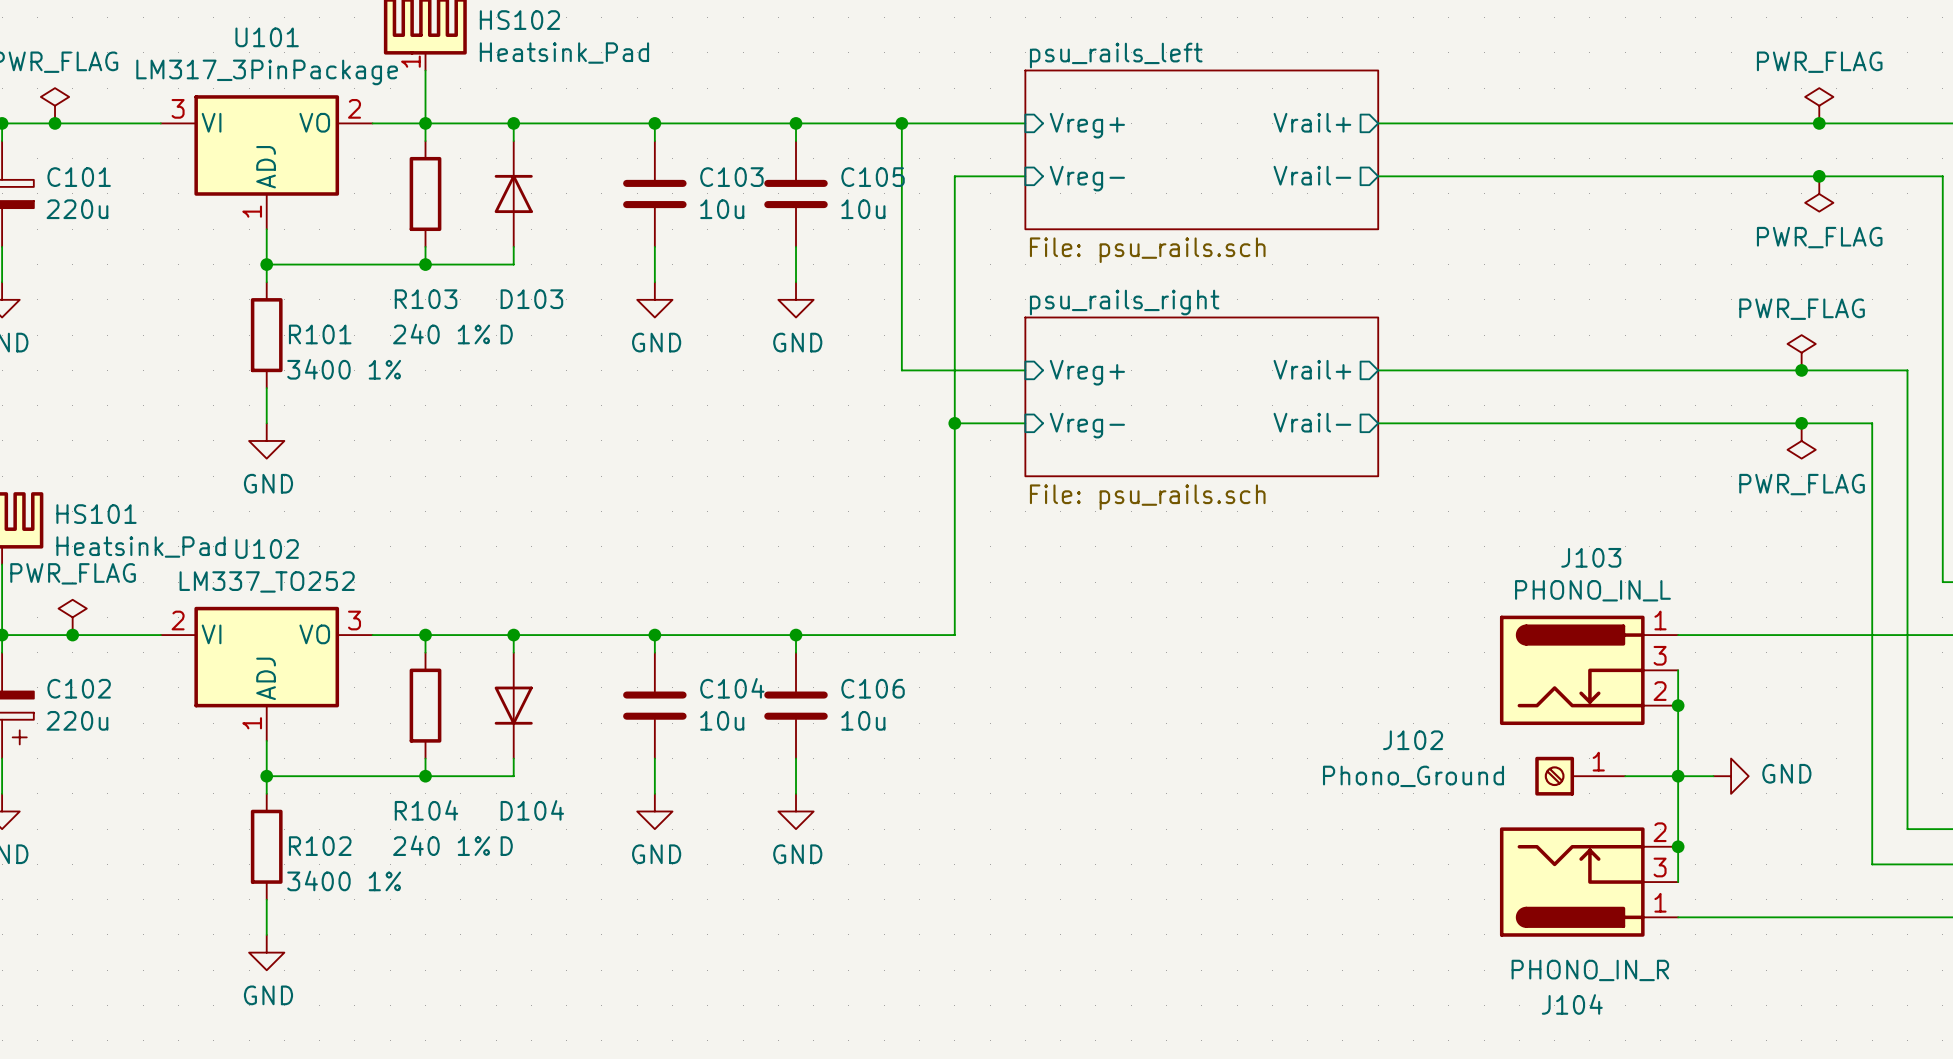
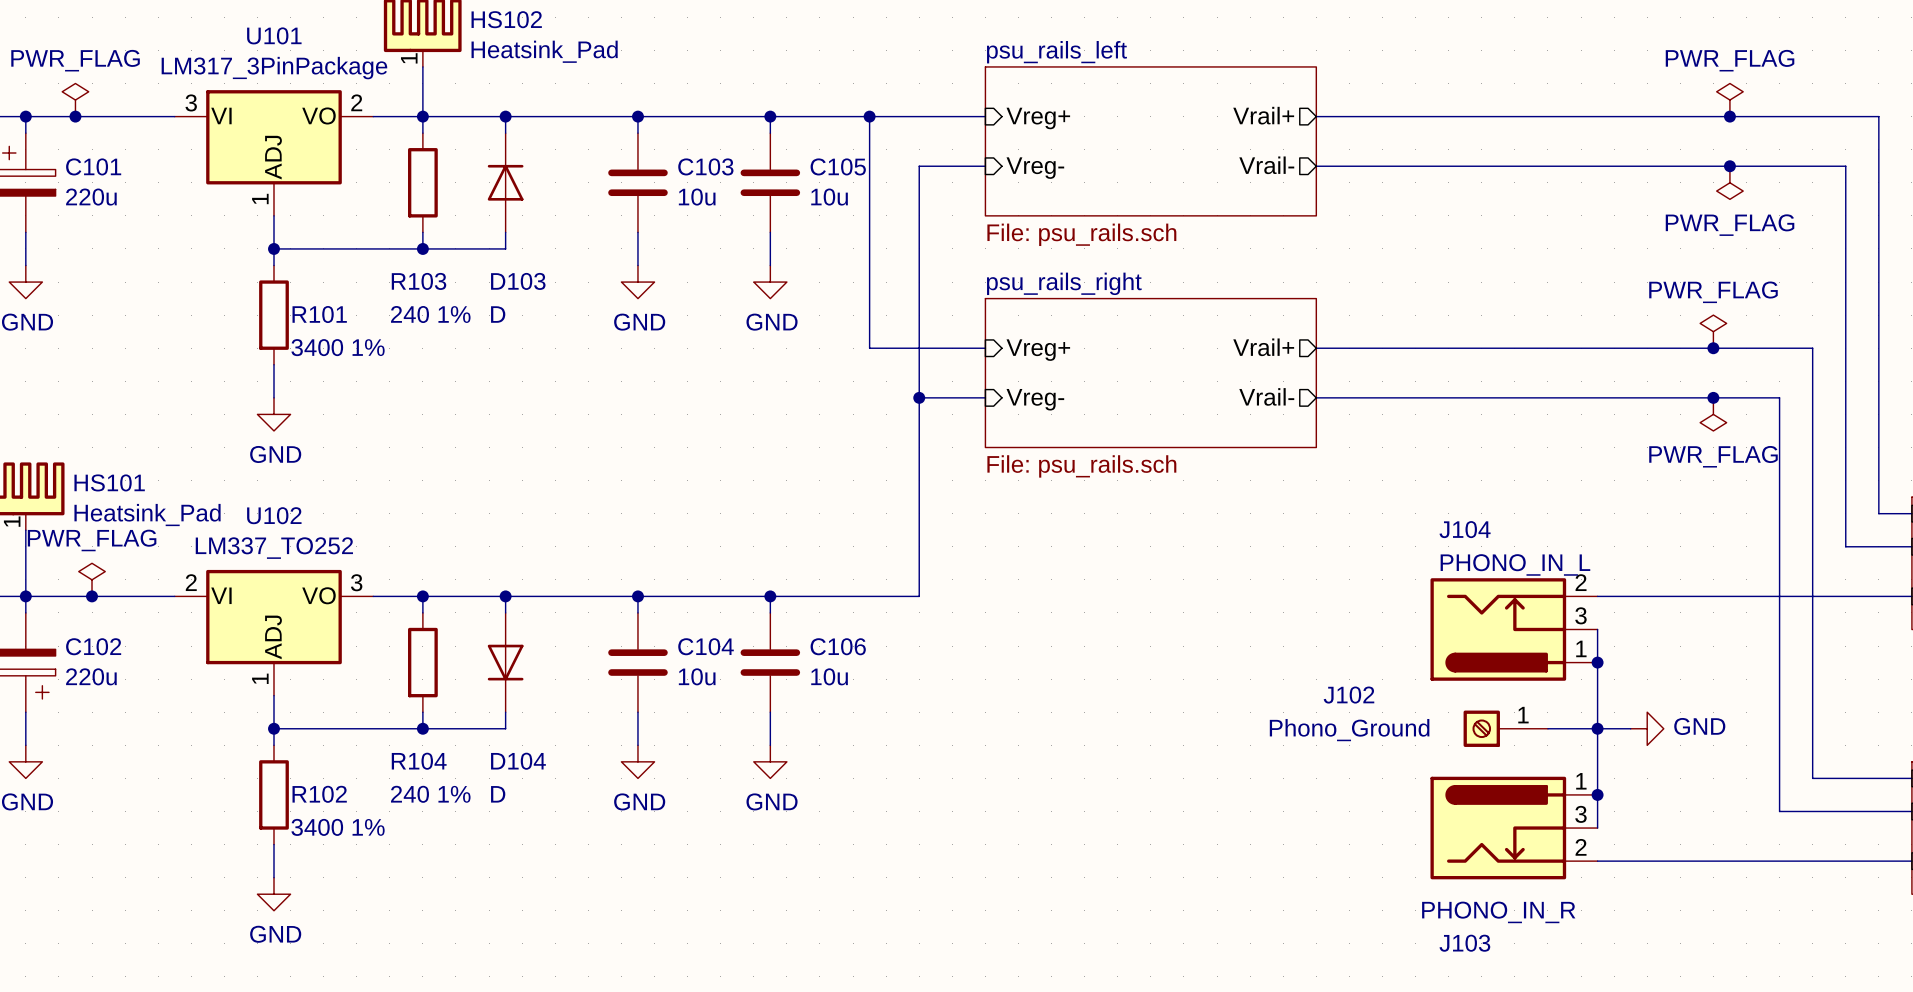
J103 name position: J103 (1591, 557) -> J103 (1464, 943)
J103 flip: as is (1572, 670) -> up-down (1498, 629)
J104 flip: as is (1572, 882) -> up-down (1498, 828)
J104 name position: J104 (1572, 1004) -> J104 (1465, 529)

